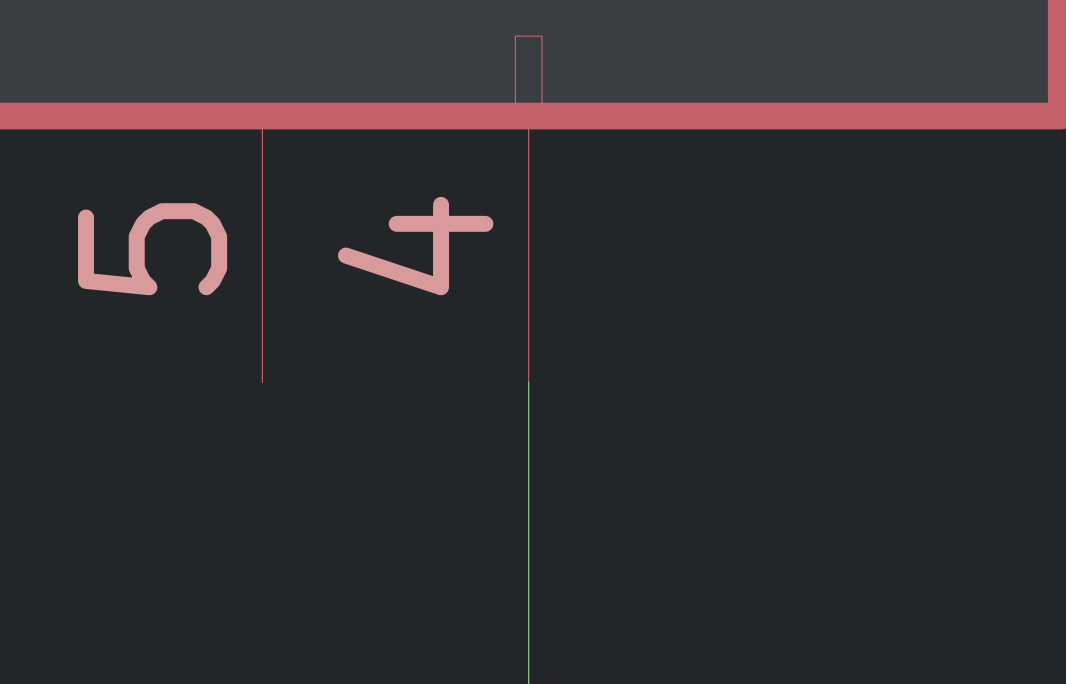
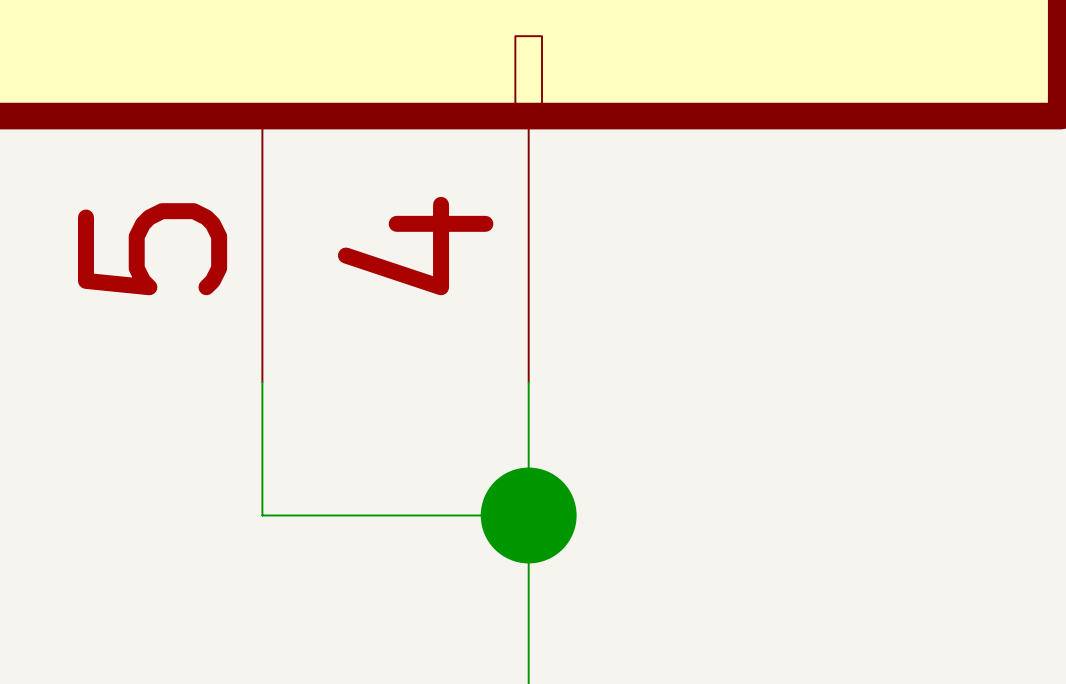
wire: none -> (262, 382) (262, 515) (528, 515)
junction: none -> (528, 515)

